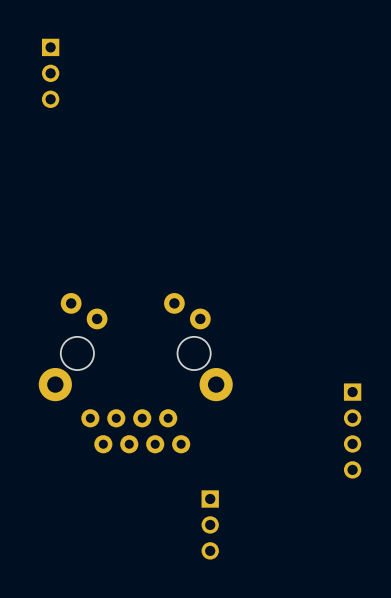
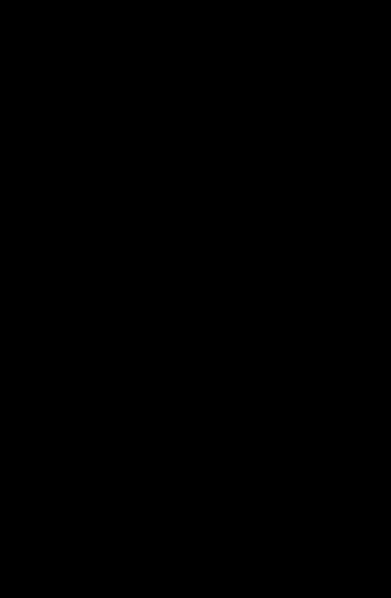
part: (50, 73) -> none
part: (135, 373) -> none
part: (352, 430) -> none
part: (210, 524) -> none

